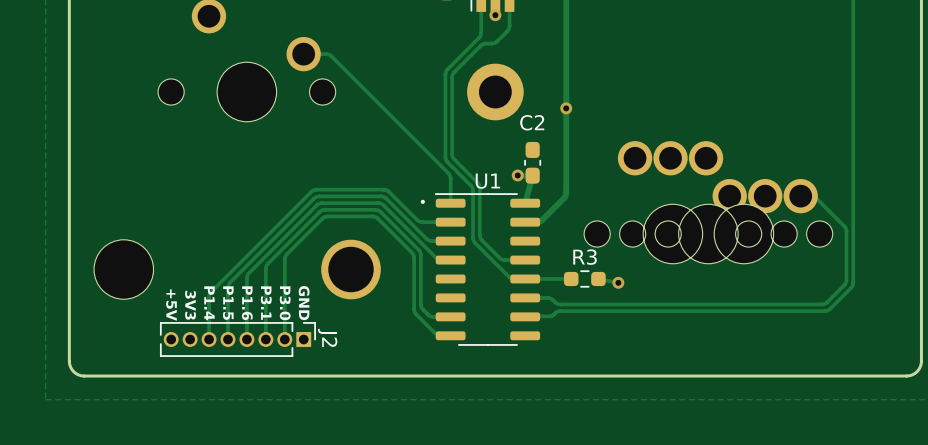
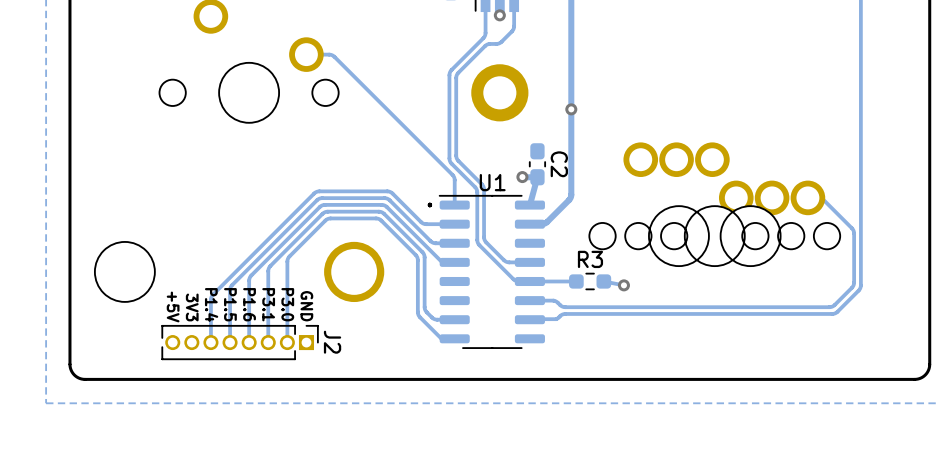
C2 name rotation: 0° (532, 122) -> 90° clockwise (559, 164)
C2 name position: C2 (532, 122) -> C2 (559, 164)

